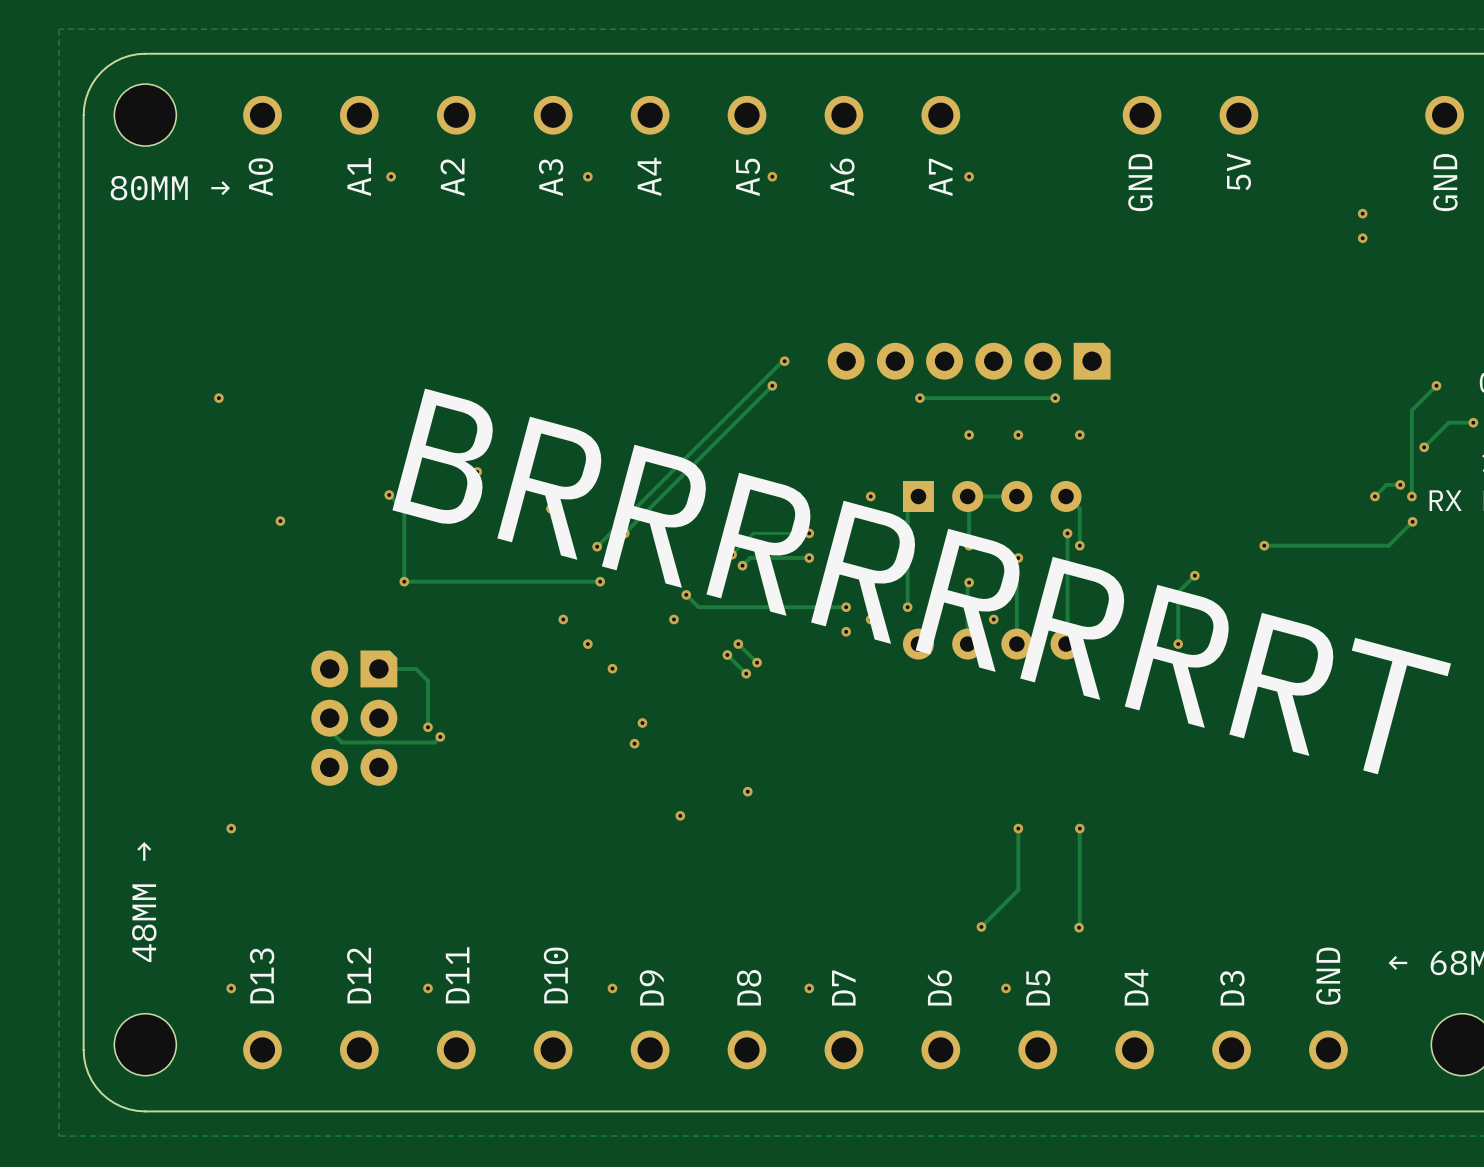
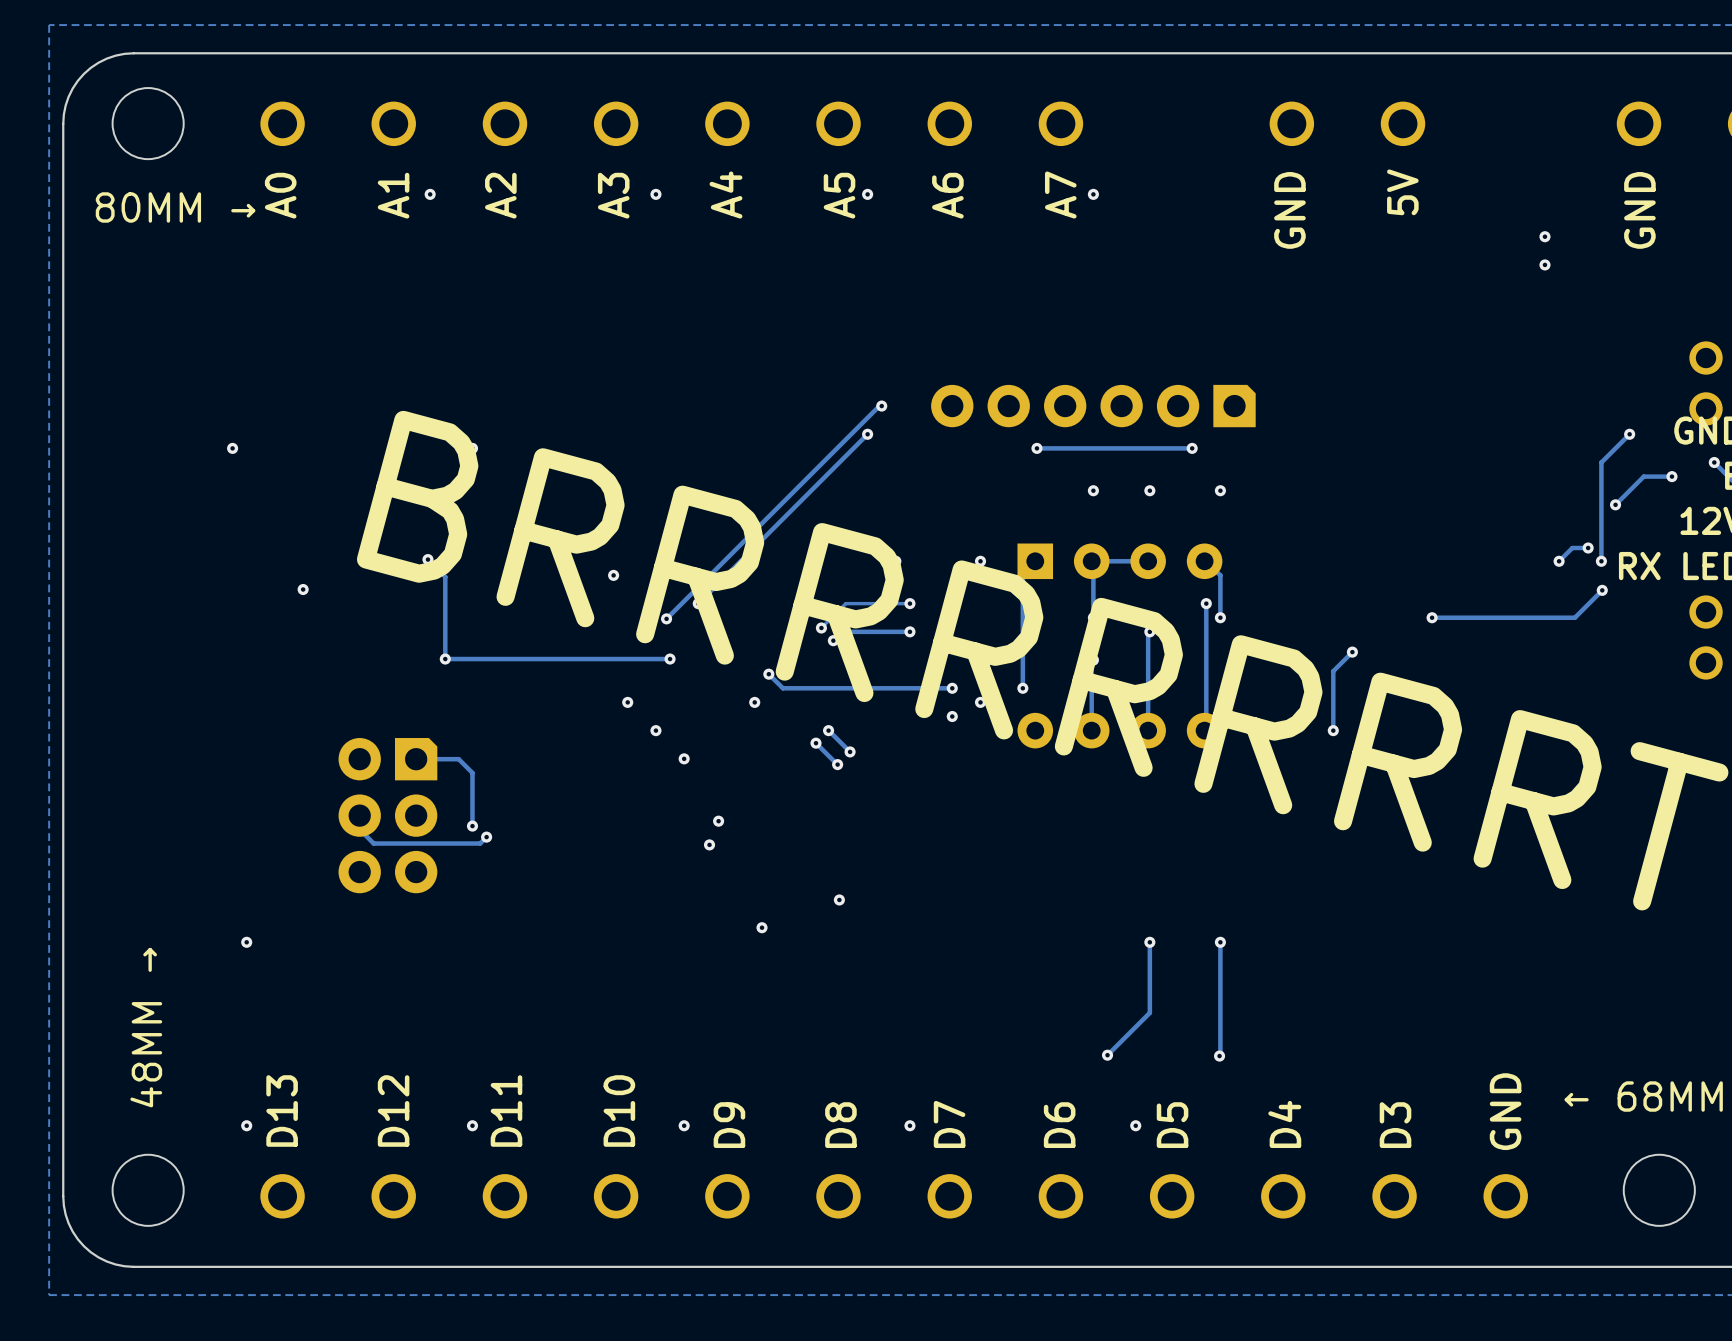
board edge: (145, 53) (121, 58) (101, 71) (88, 91) (83, 115) (83, 1049) (88, 1073) (101, 1093) (121, 1106) (145, 1111) -> (147, 53) (115, 55) (90, 67) (72, 88) (65, 105) (63, 123) (63, 1205) (72, 1231) (90, 1252) (115, 1264) (147, 1266)

